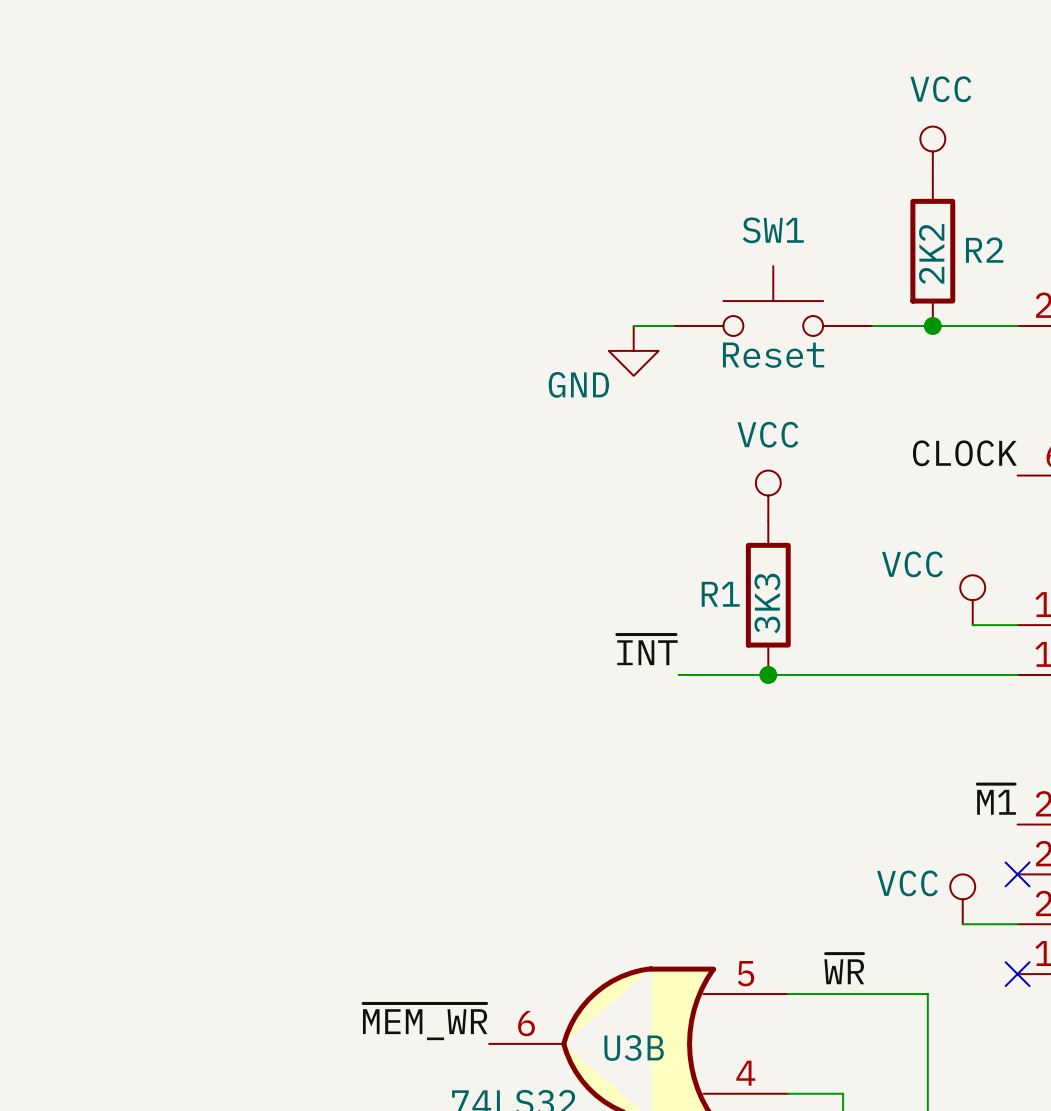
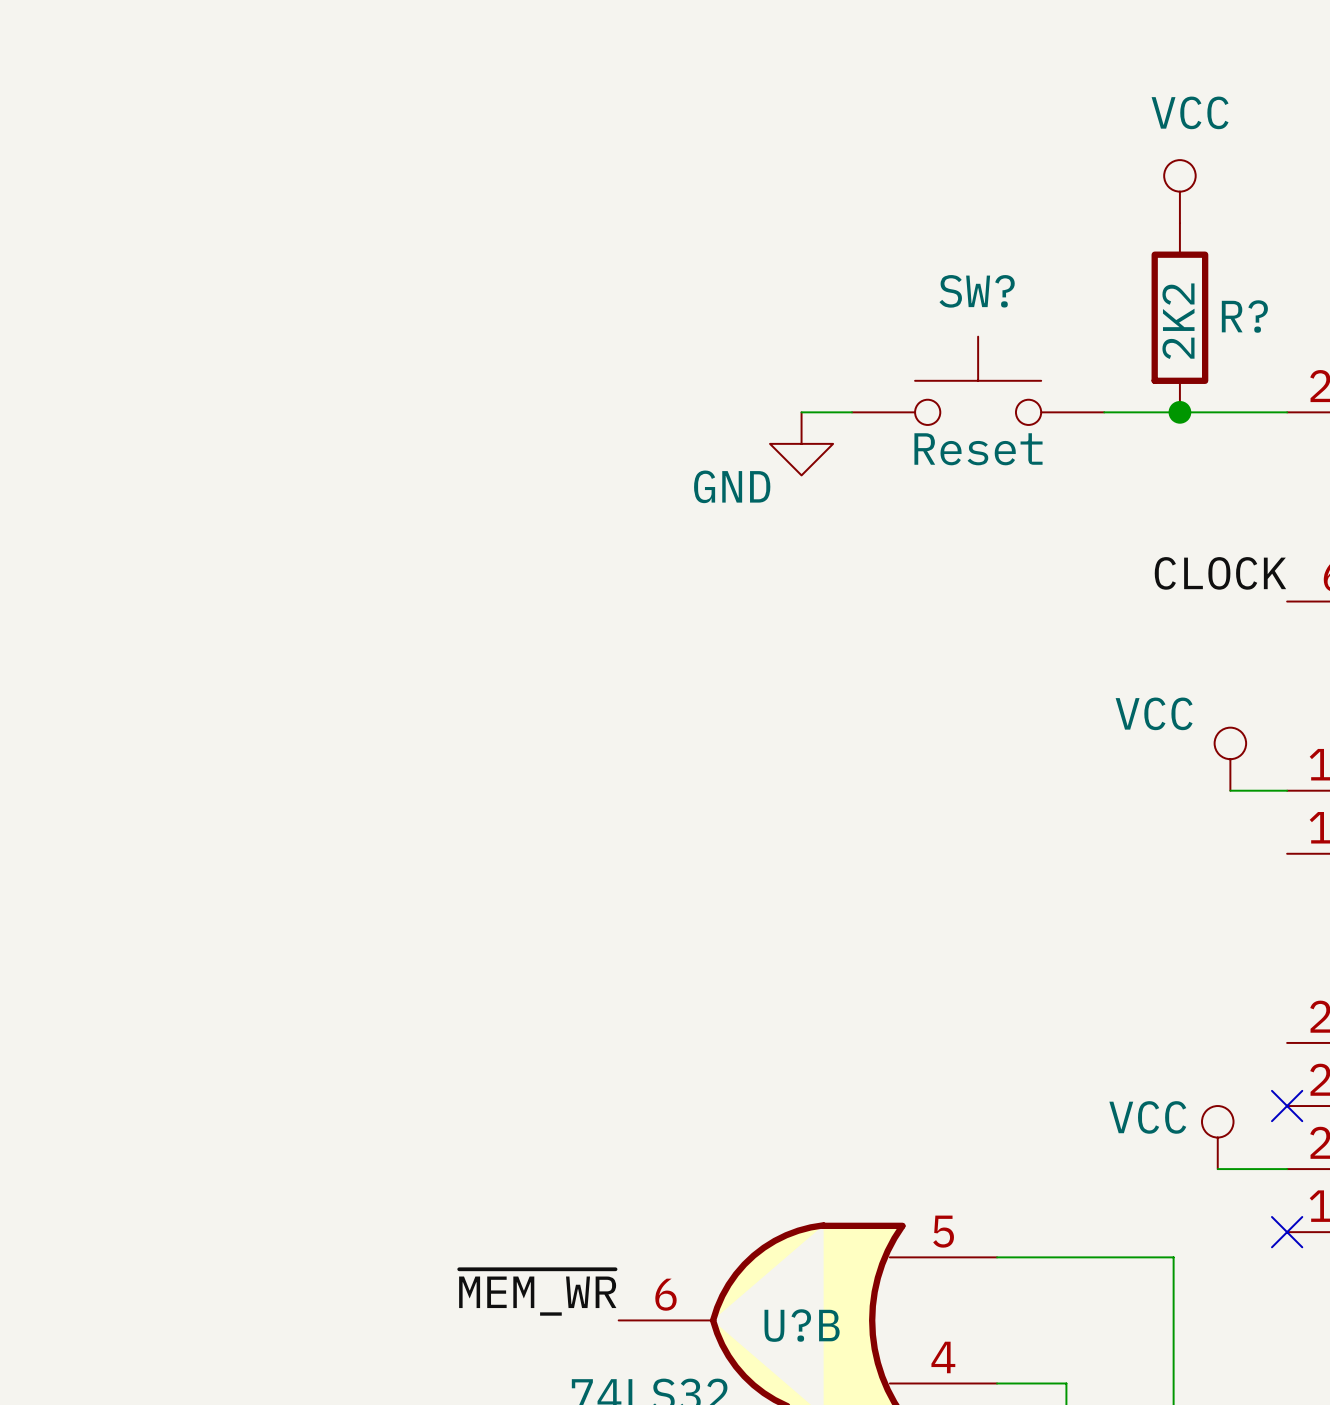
SW1 name: SW1 (773, 230) -> SW? (977, 291)
R2 name: R2 (984, 250) -> R? (1244, 316)
power symbol: VCC (768, 495) -> none
R1: 3K3 (768, 595) -> none
label: ~{INT} (647, 649) -> none
wire: (678, 674) (1017, 674) -> none
junction: (768, 674) -> none
label: ~{M1} (996, 799) -> none
label: ~{WR} (844, 968) -> none
U3B name: U3B (634, 1047) -> U?B (802, 1325)

